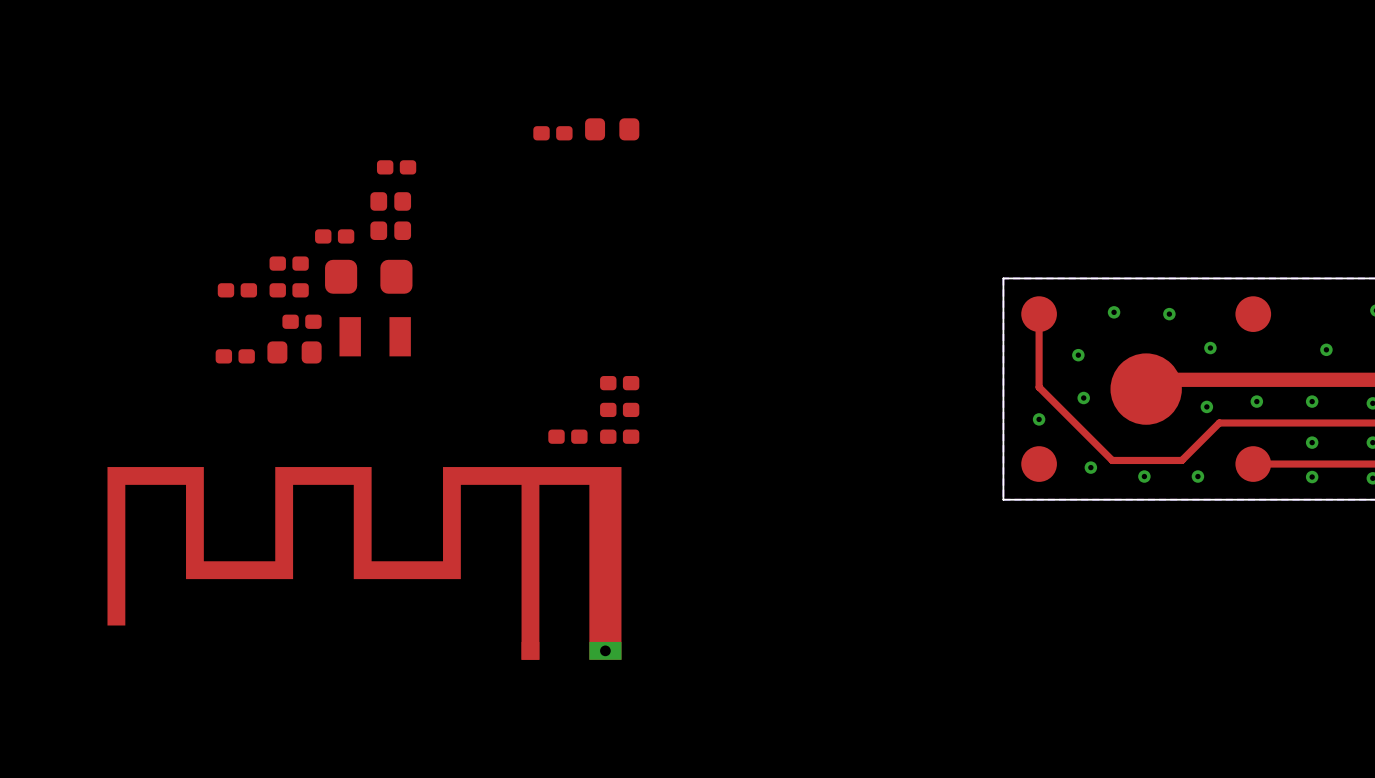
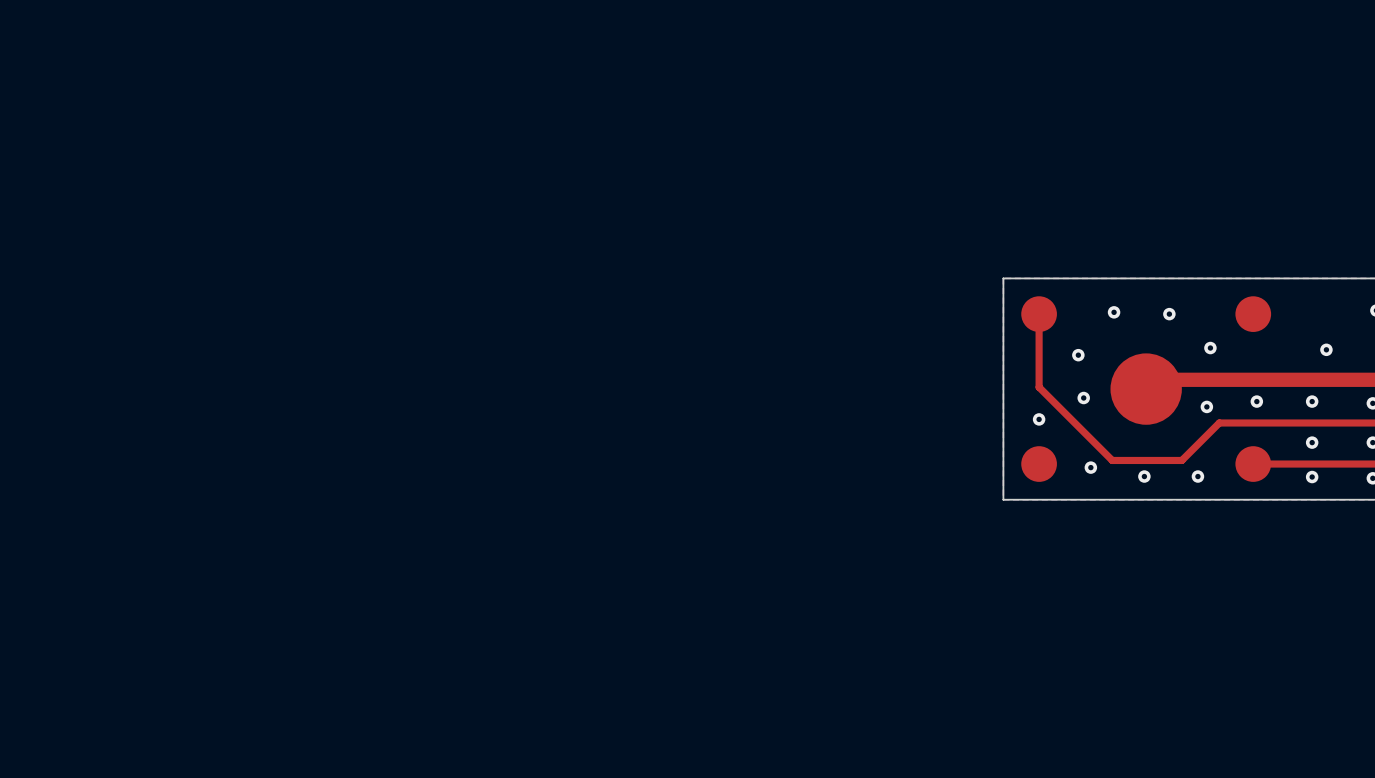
part: (612, 129) -> none
part: (552, 133) -> none
part: (396, 167) -> none
part: (390, 216) -> none
part: (334, 236) -> none
part: (289, 263) -> none
part: (368, 276) -> none
part: (237, 290) -> none
part: (289, 290) -> none
part: (302, 321) -> none
part: (375, 336) -> none
part: (294, 352) -> none
part: (235, 356) -> none
part: (619, 383) -> none
part: (619, 409) -> none
part: (567, 436) -> none
part: (619, 436) -> none
part: (364, 563) -> none

